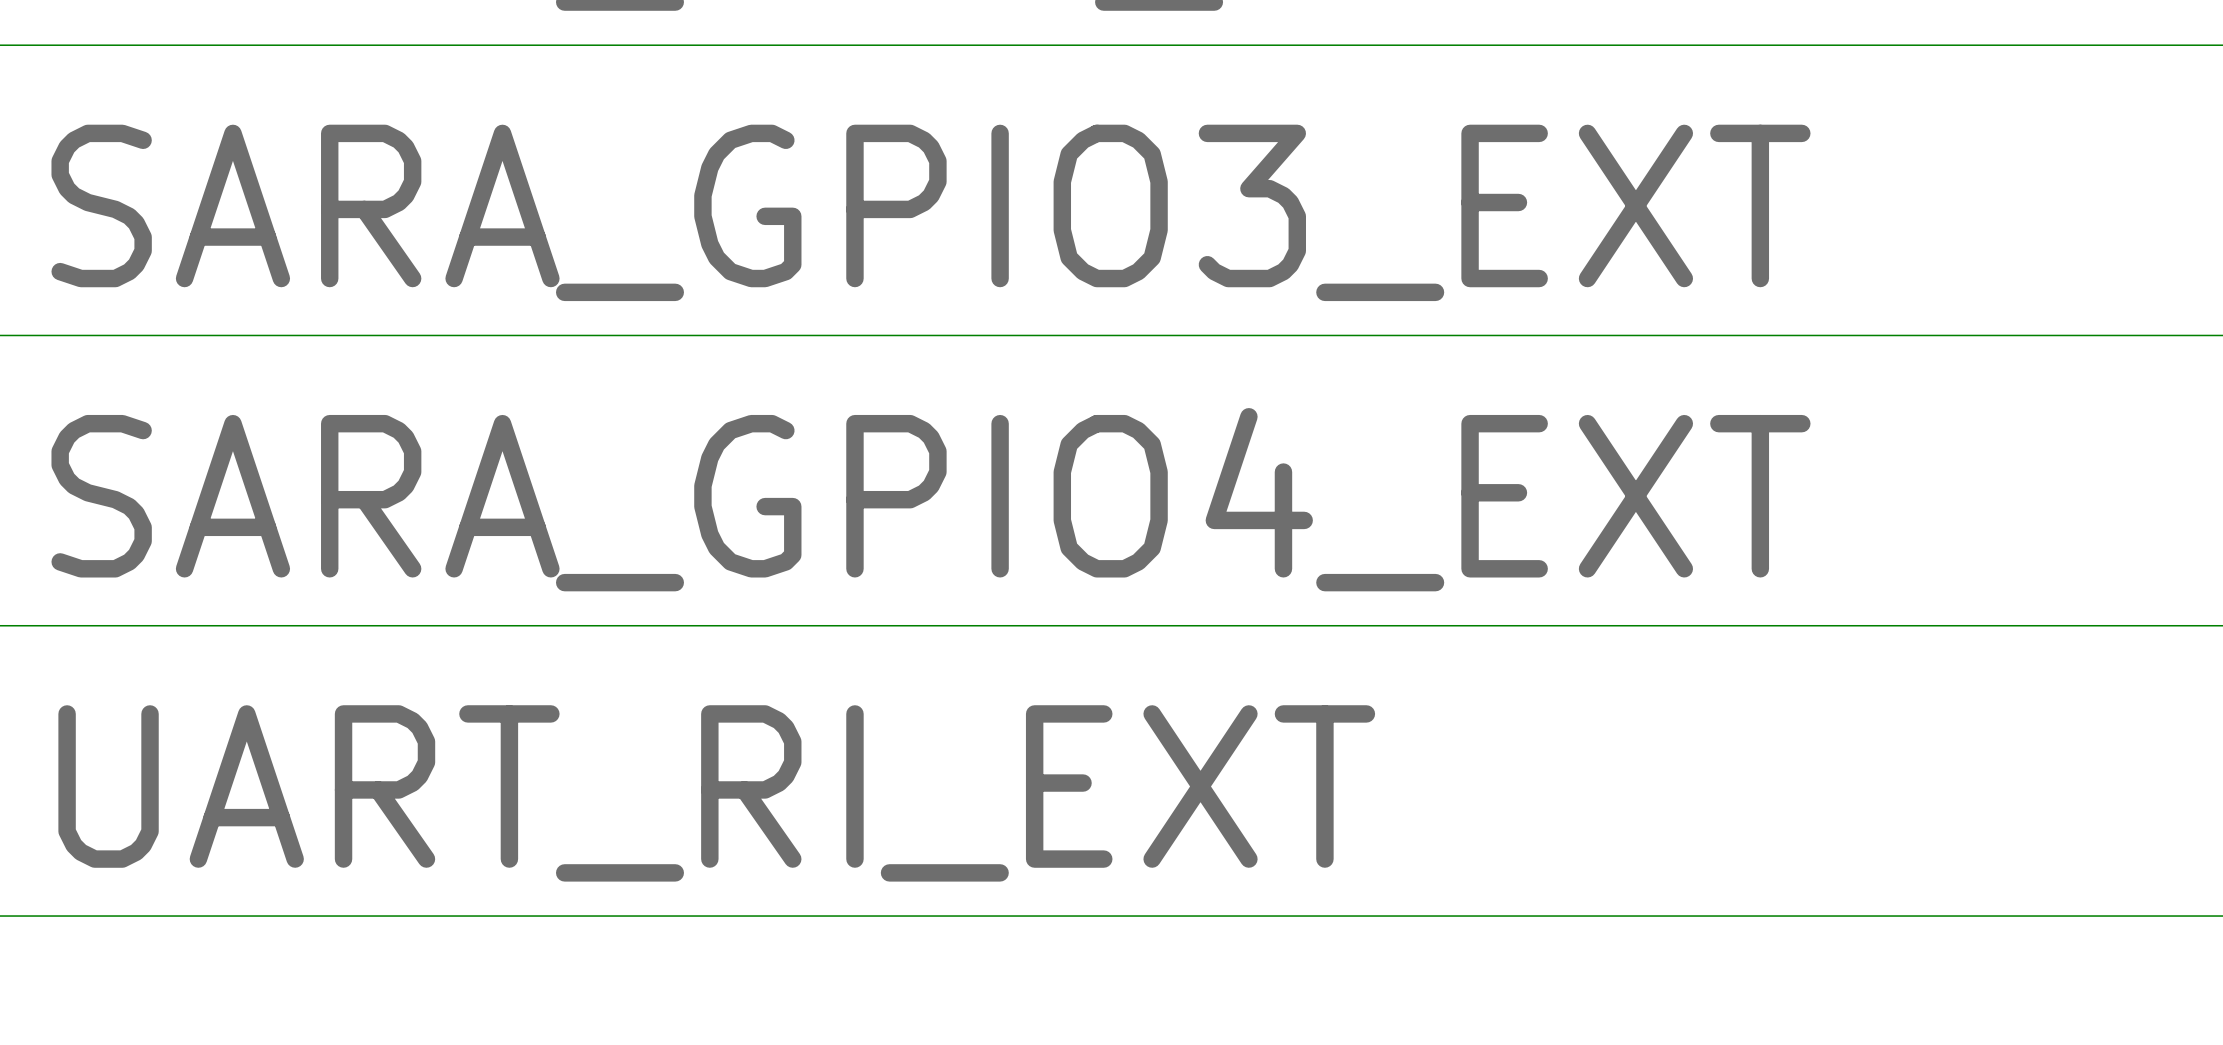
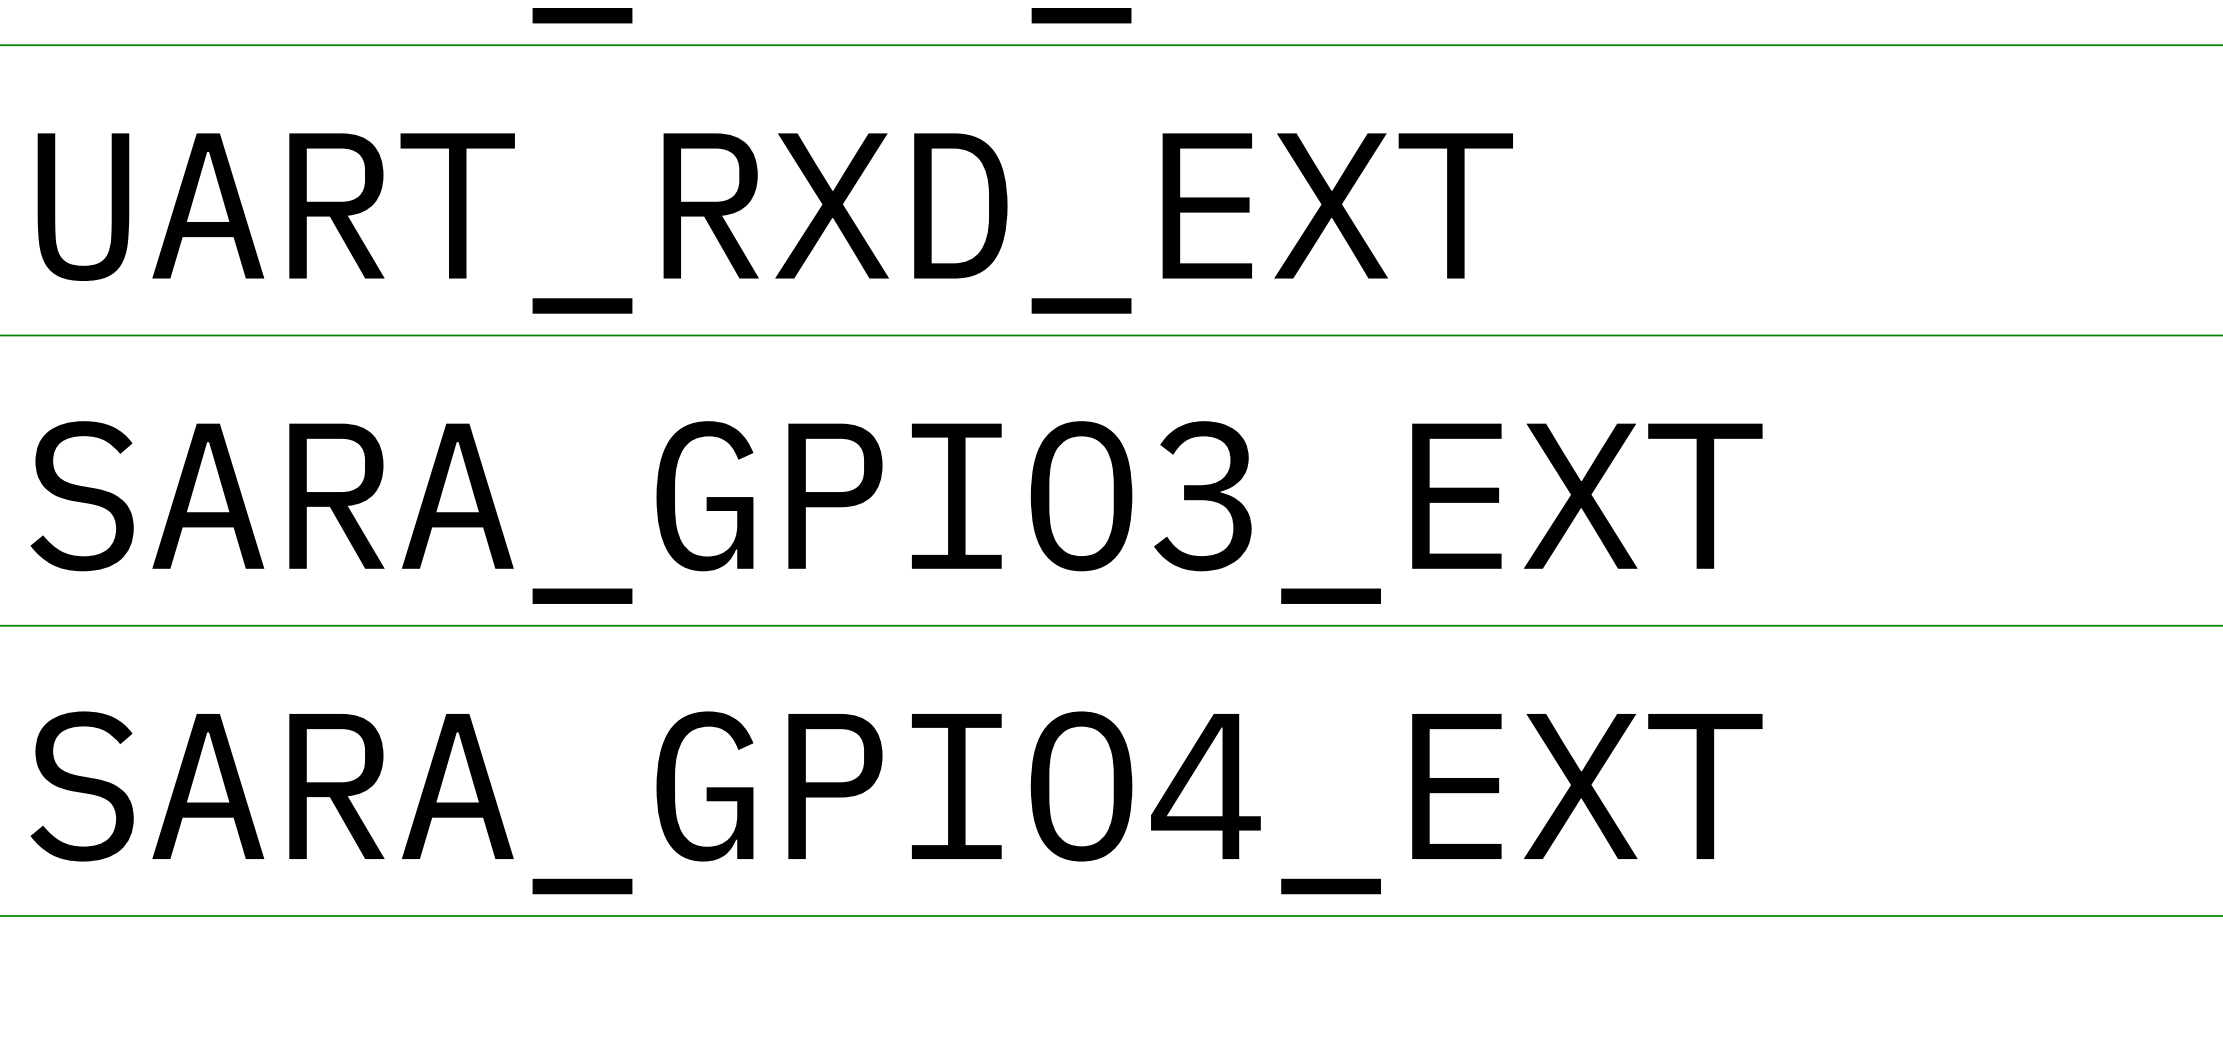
label: SARA_GPIO3_EXT (930, 212) -> UART_RXD_EXT (775, 223)
label: SARA_GPIO4_EXT (930, 499) -> SARA_GPIO3_EXT (896, 512)
label: UART_RI_EXT (716, 793) -> SARA_GPIO4_EXT (896, 802)

